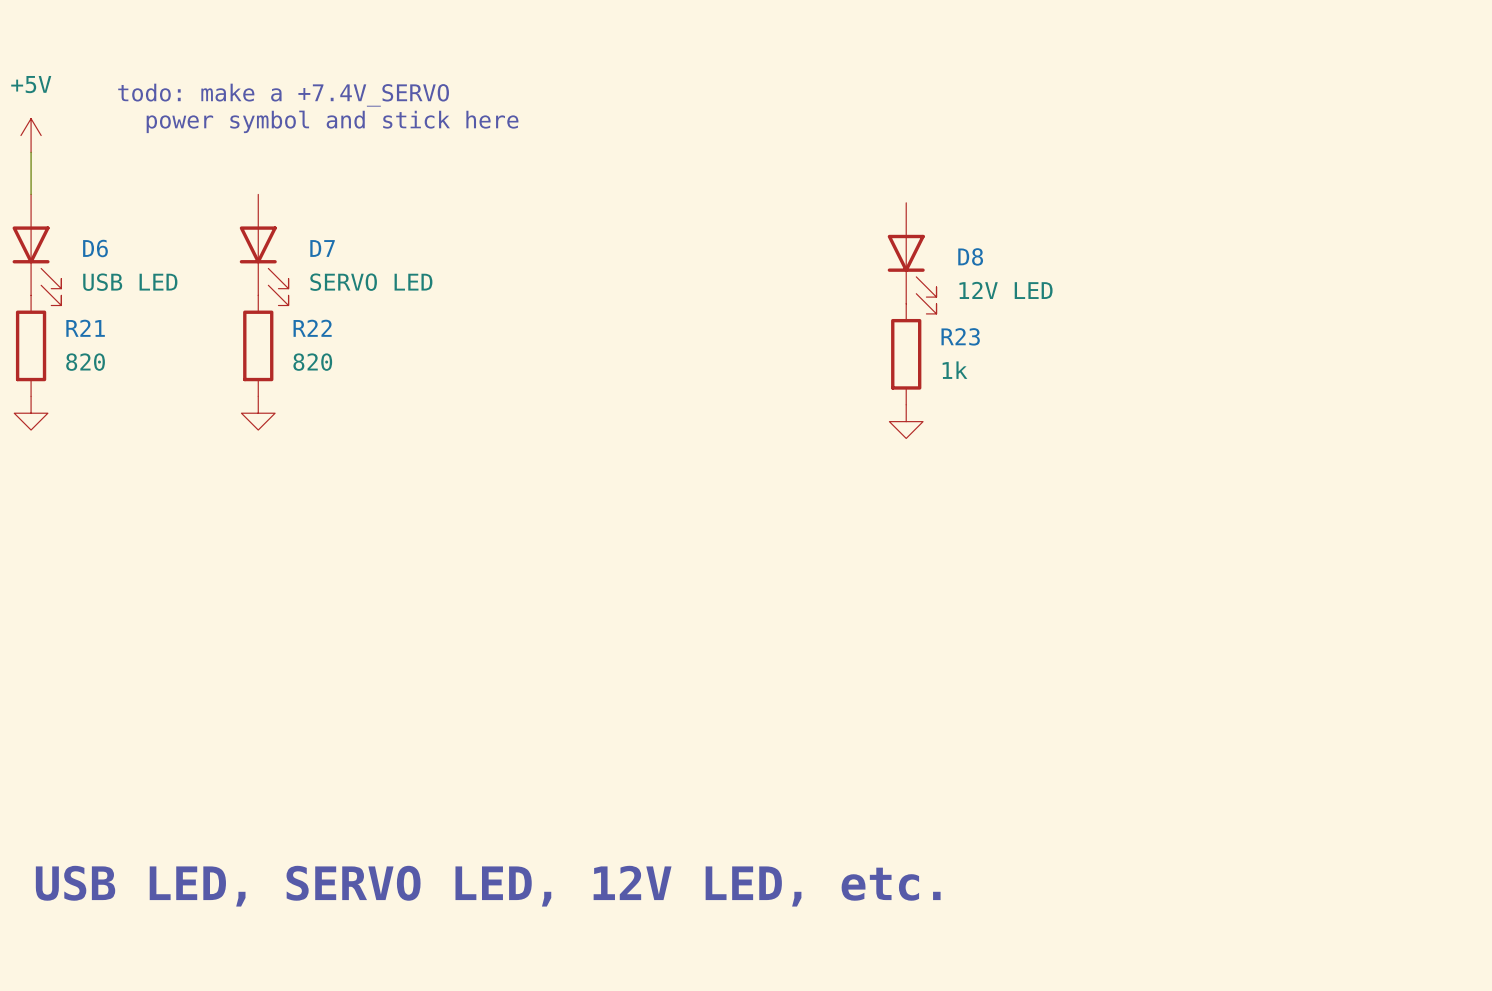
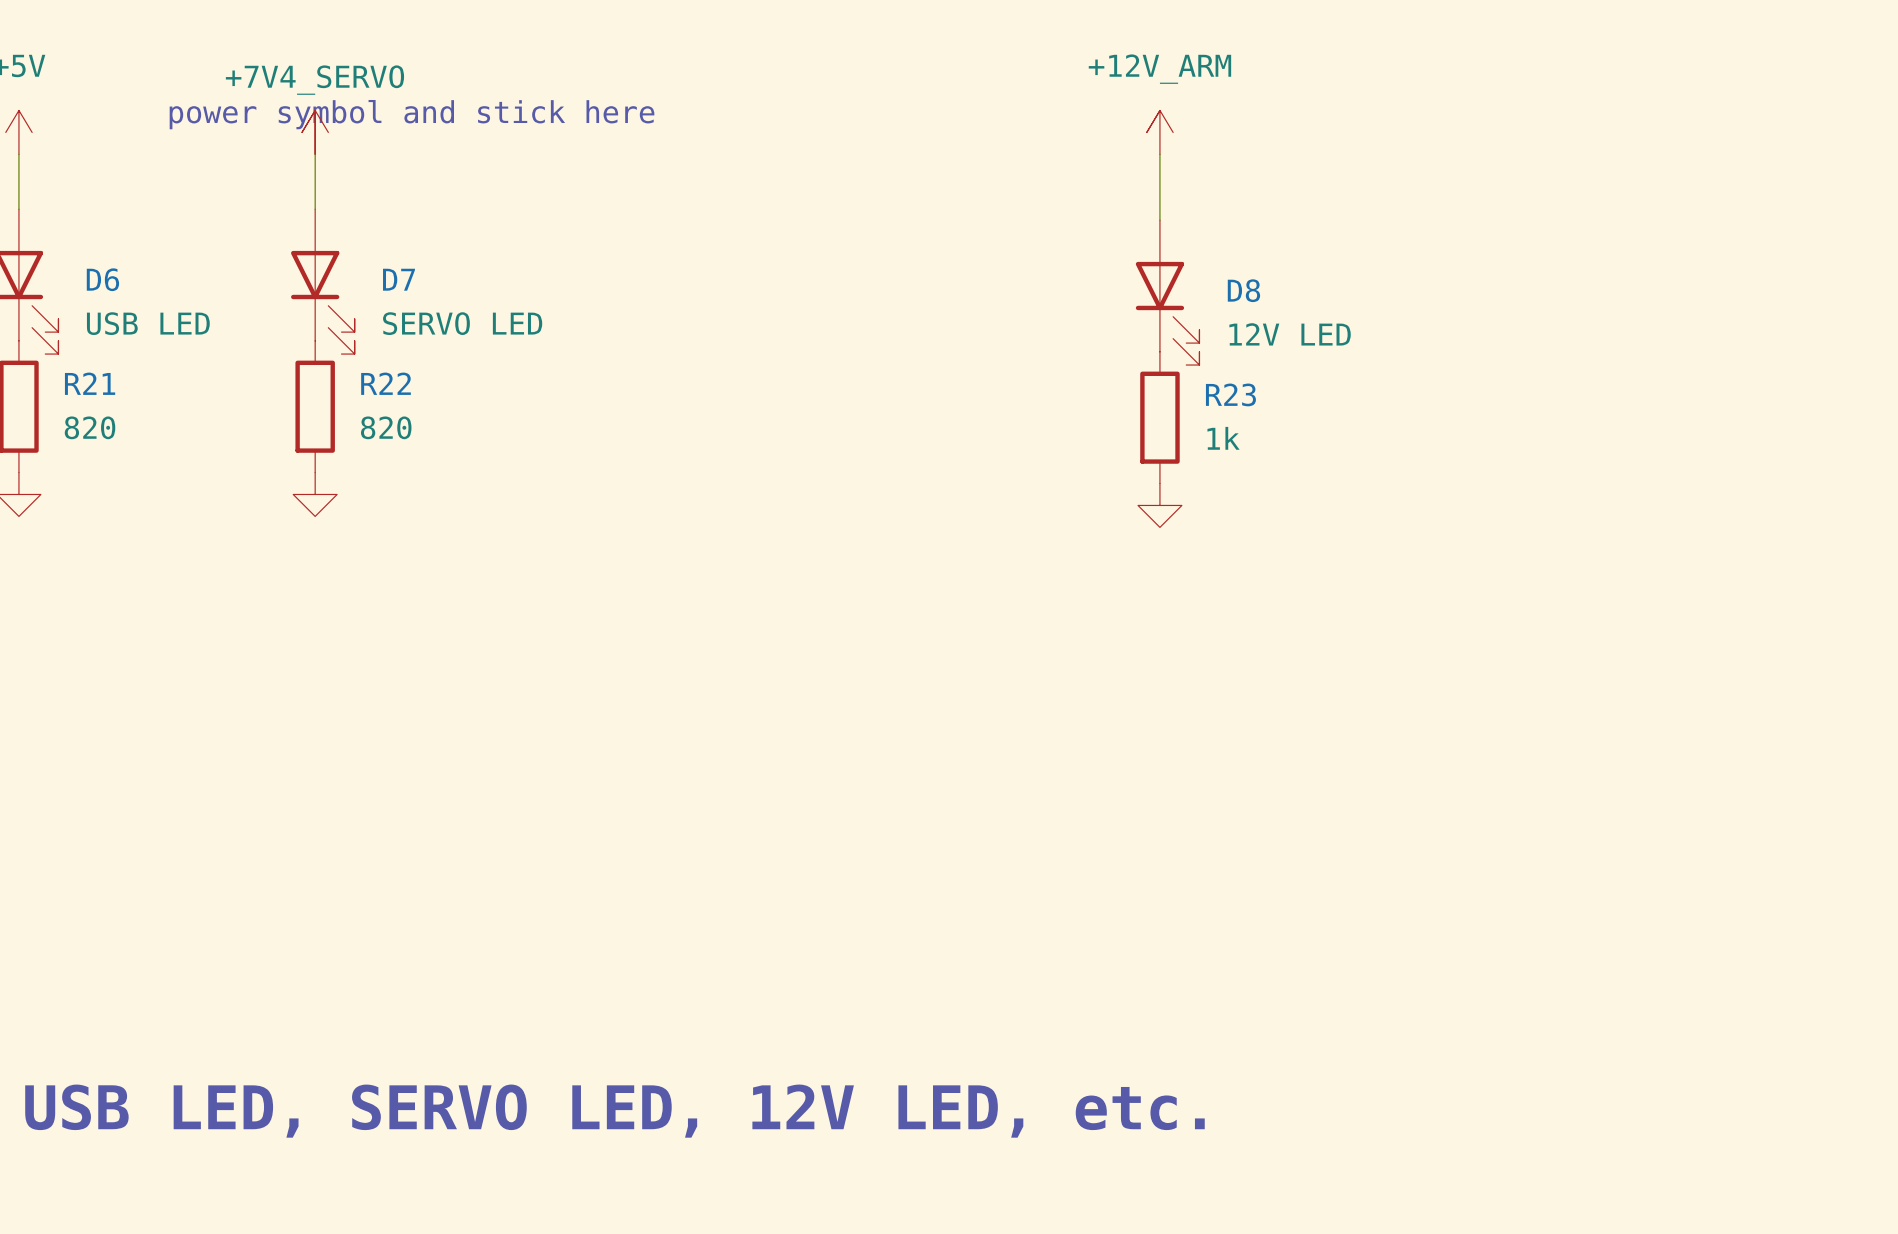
text: todo: make a +7.4V_SERVO (283, 95) -> none
power symbol: none -> +7V4_SERVO (315, 132)
power symbol: none -> +12V_ARM (1159, 132)
wire: none -> (315, 154) (315, 209)
wire: none -> (1159, 154) (1159, 220)

